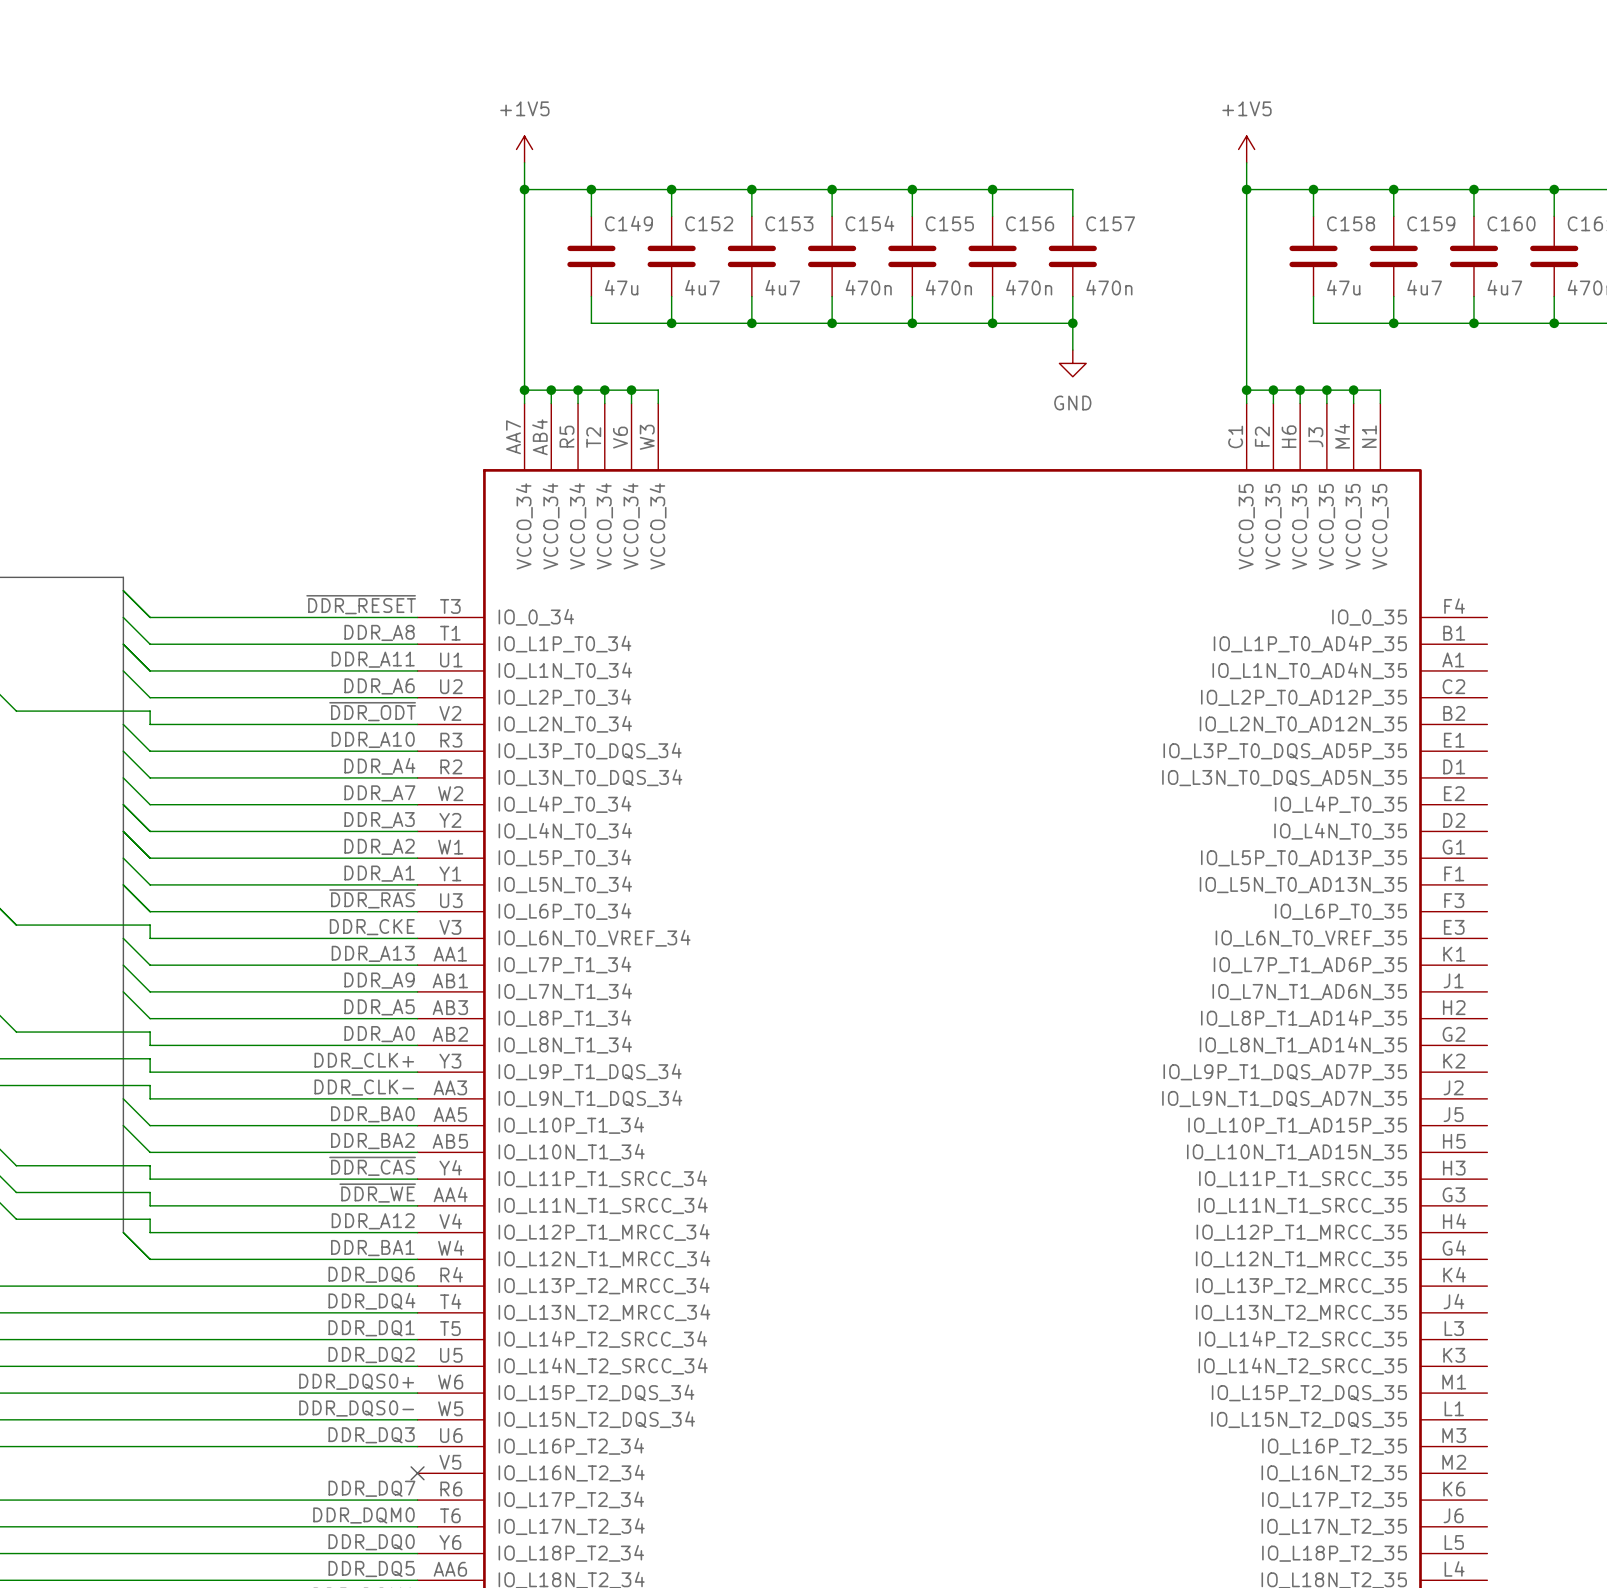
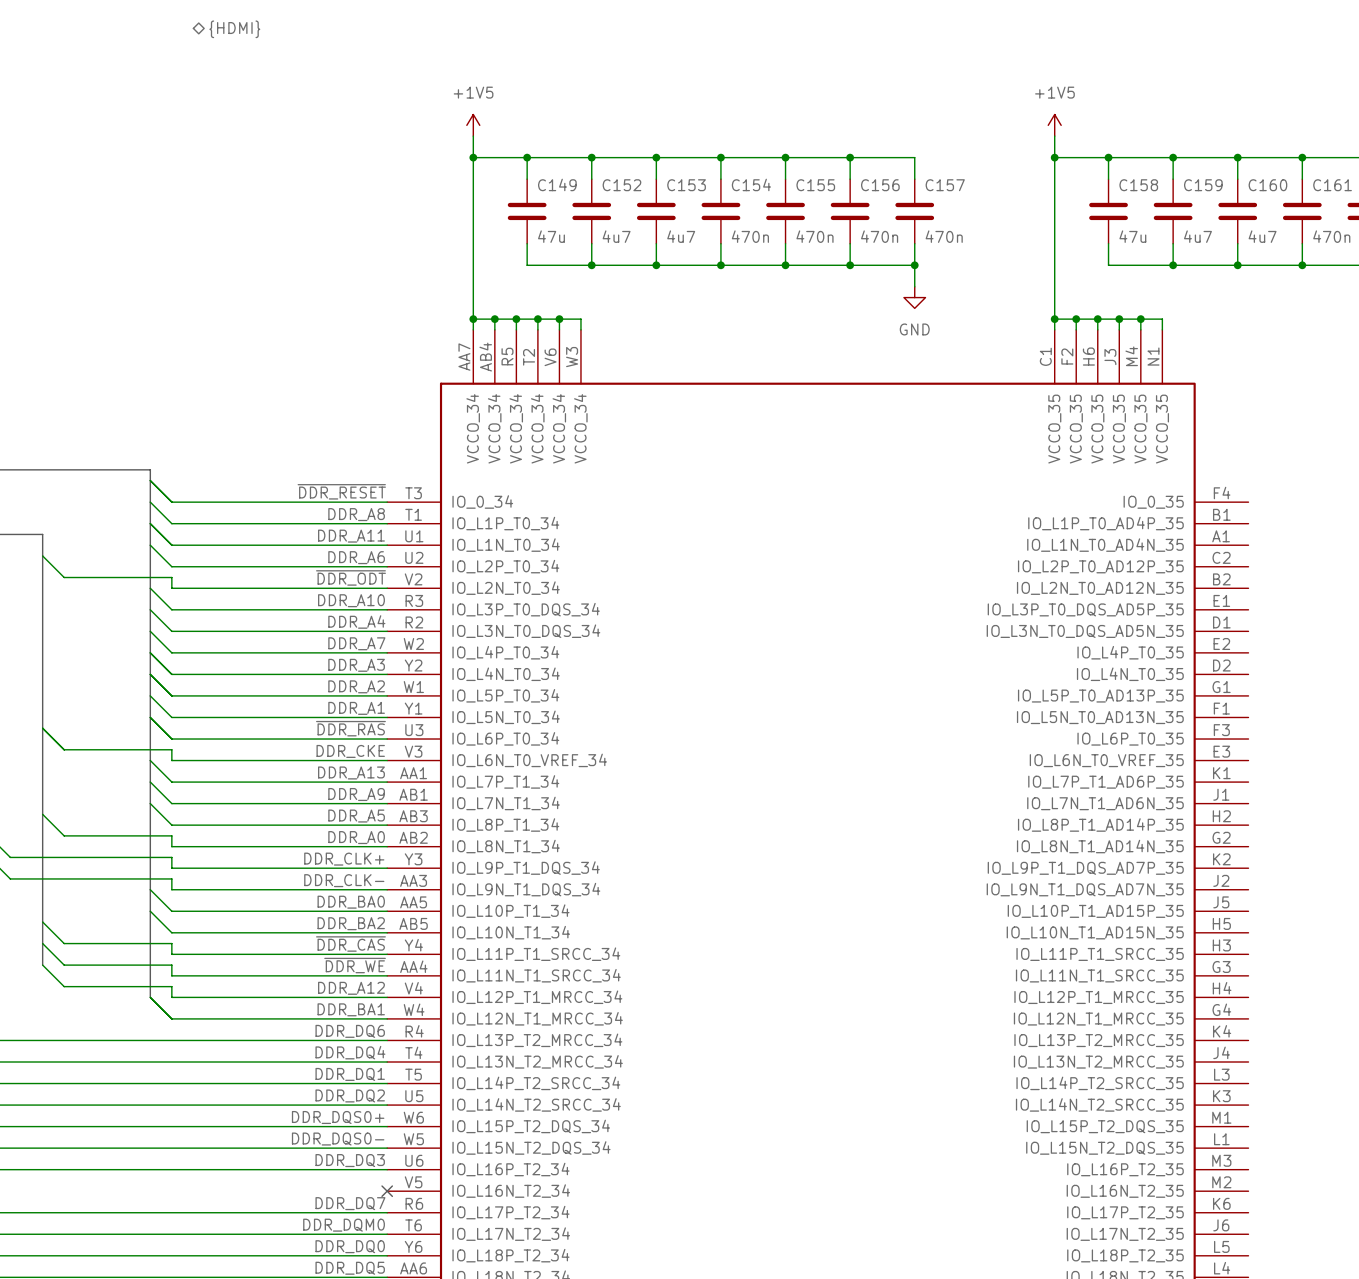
hierarchical label: none -> {HDMI} (234, 29)

